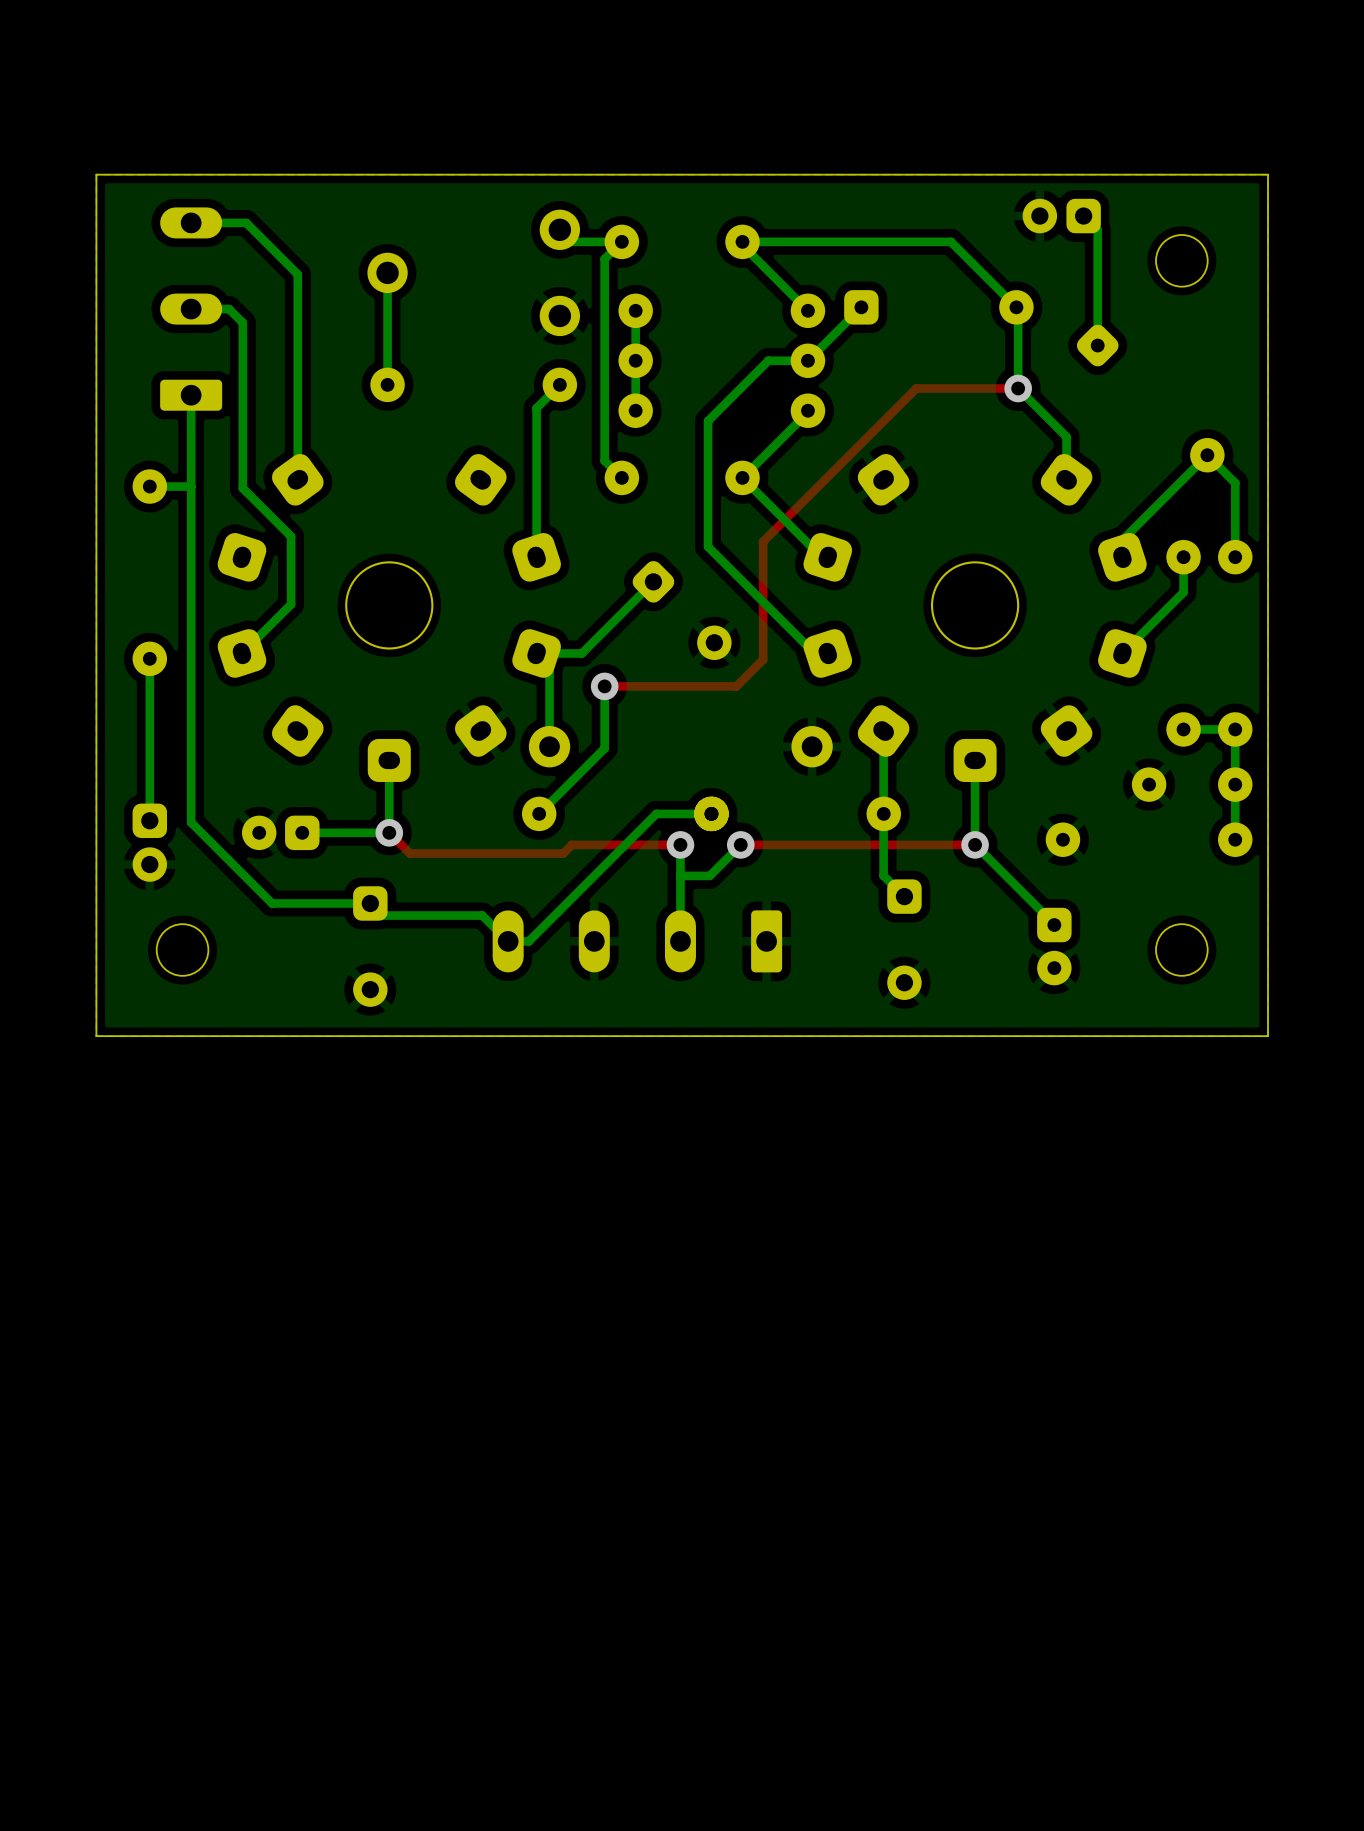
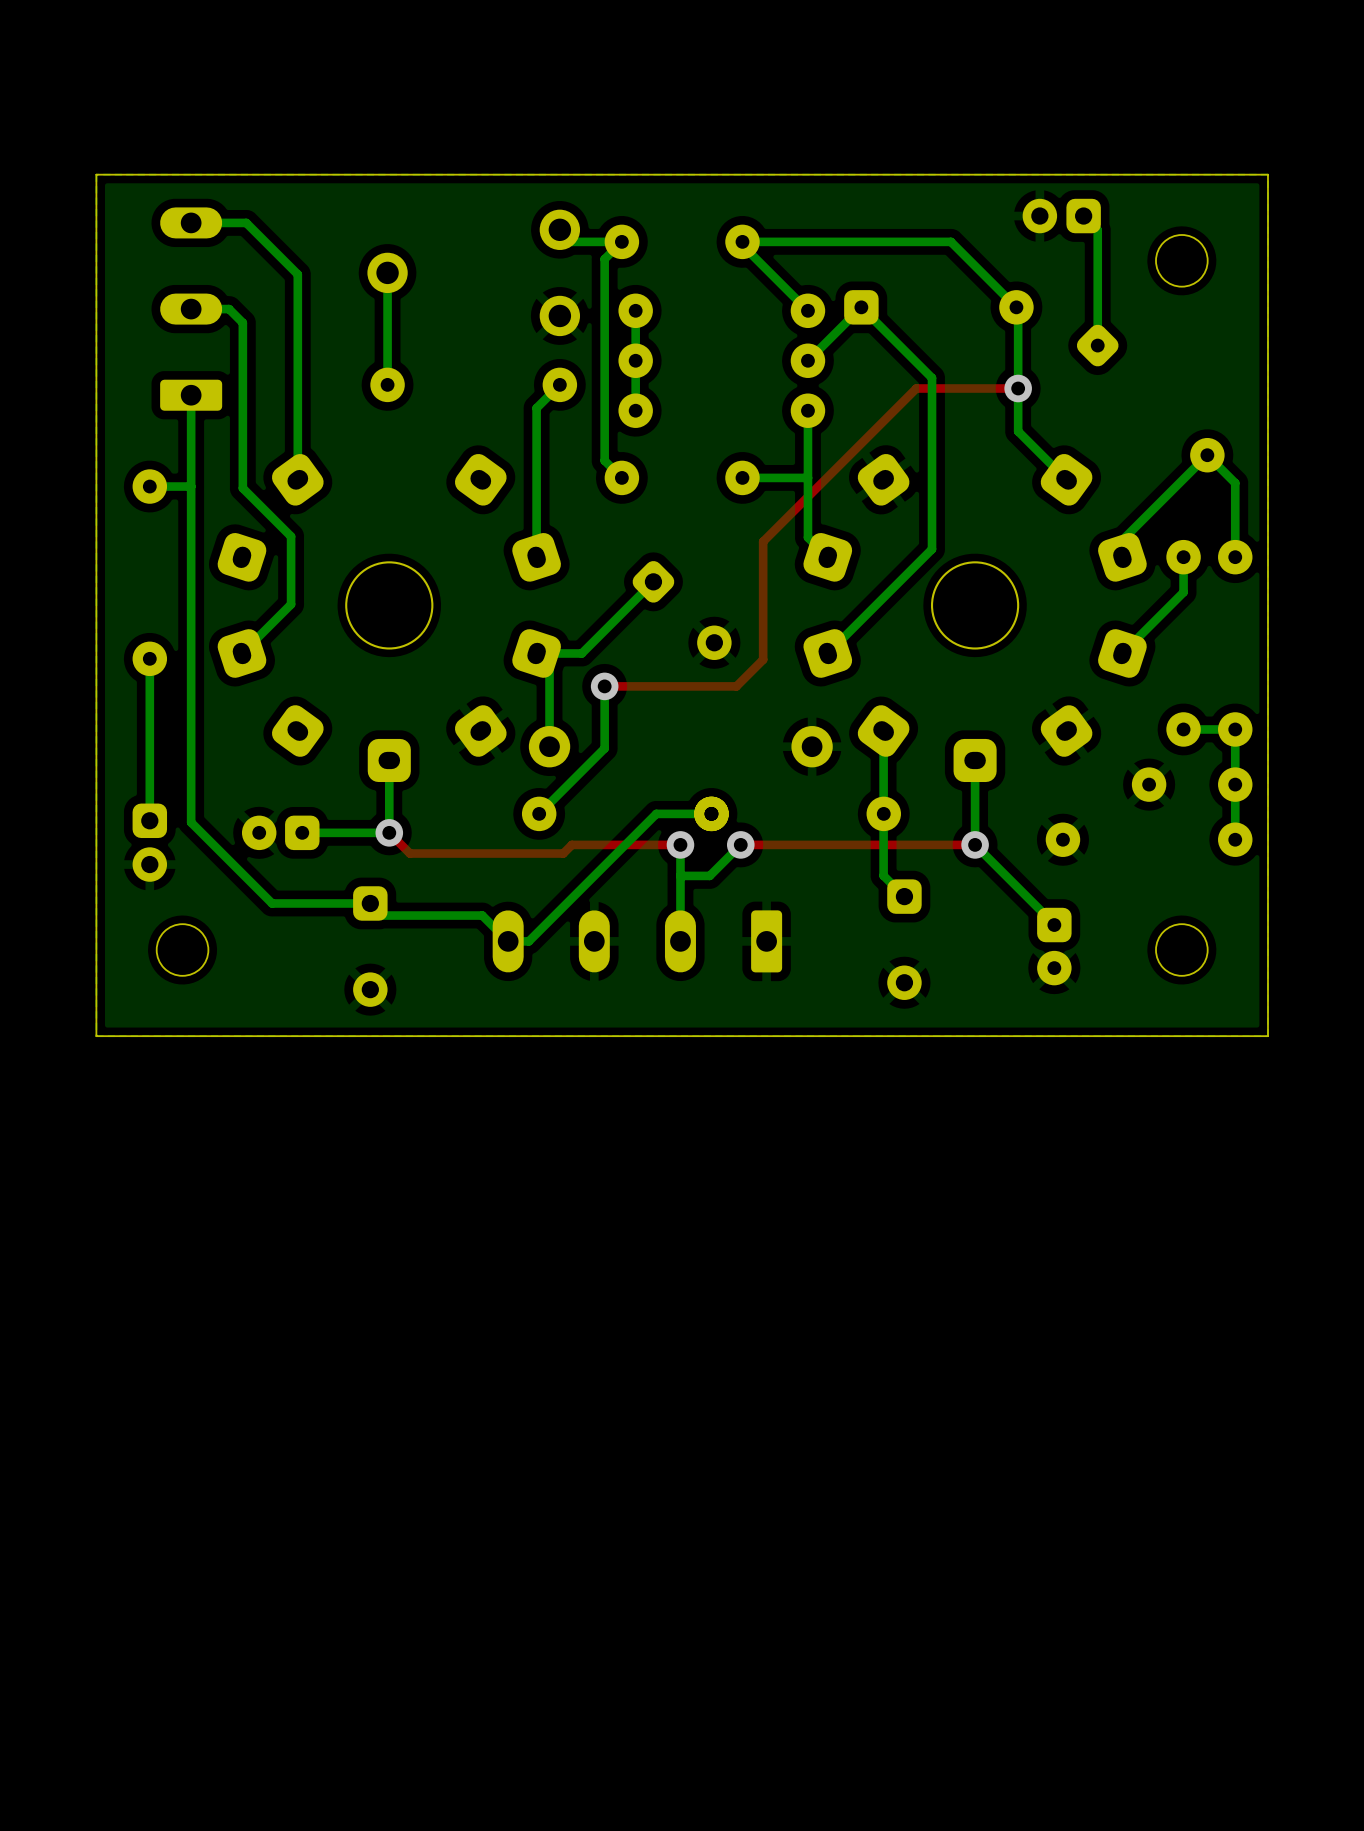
bottom track: (807, 360) (768, 360) (708, 421) (708, 546) (814, 653) (827, 653) -> (861, 307) (932, 377) (932, 549) (827, 653)
bottom track: (1018, 388) (1066, 436) (1066, 479) -> (1018, 388) (1018, 431) (1066, 479)
bottom track: (807, 412) (742, 477) (821, 557) (827, 557) -> (807, 412) (807, 537) (827, 557)
bottom track: none -> (807, 477) (742, 477)

